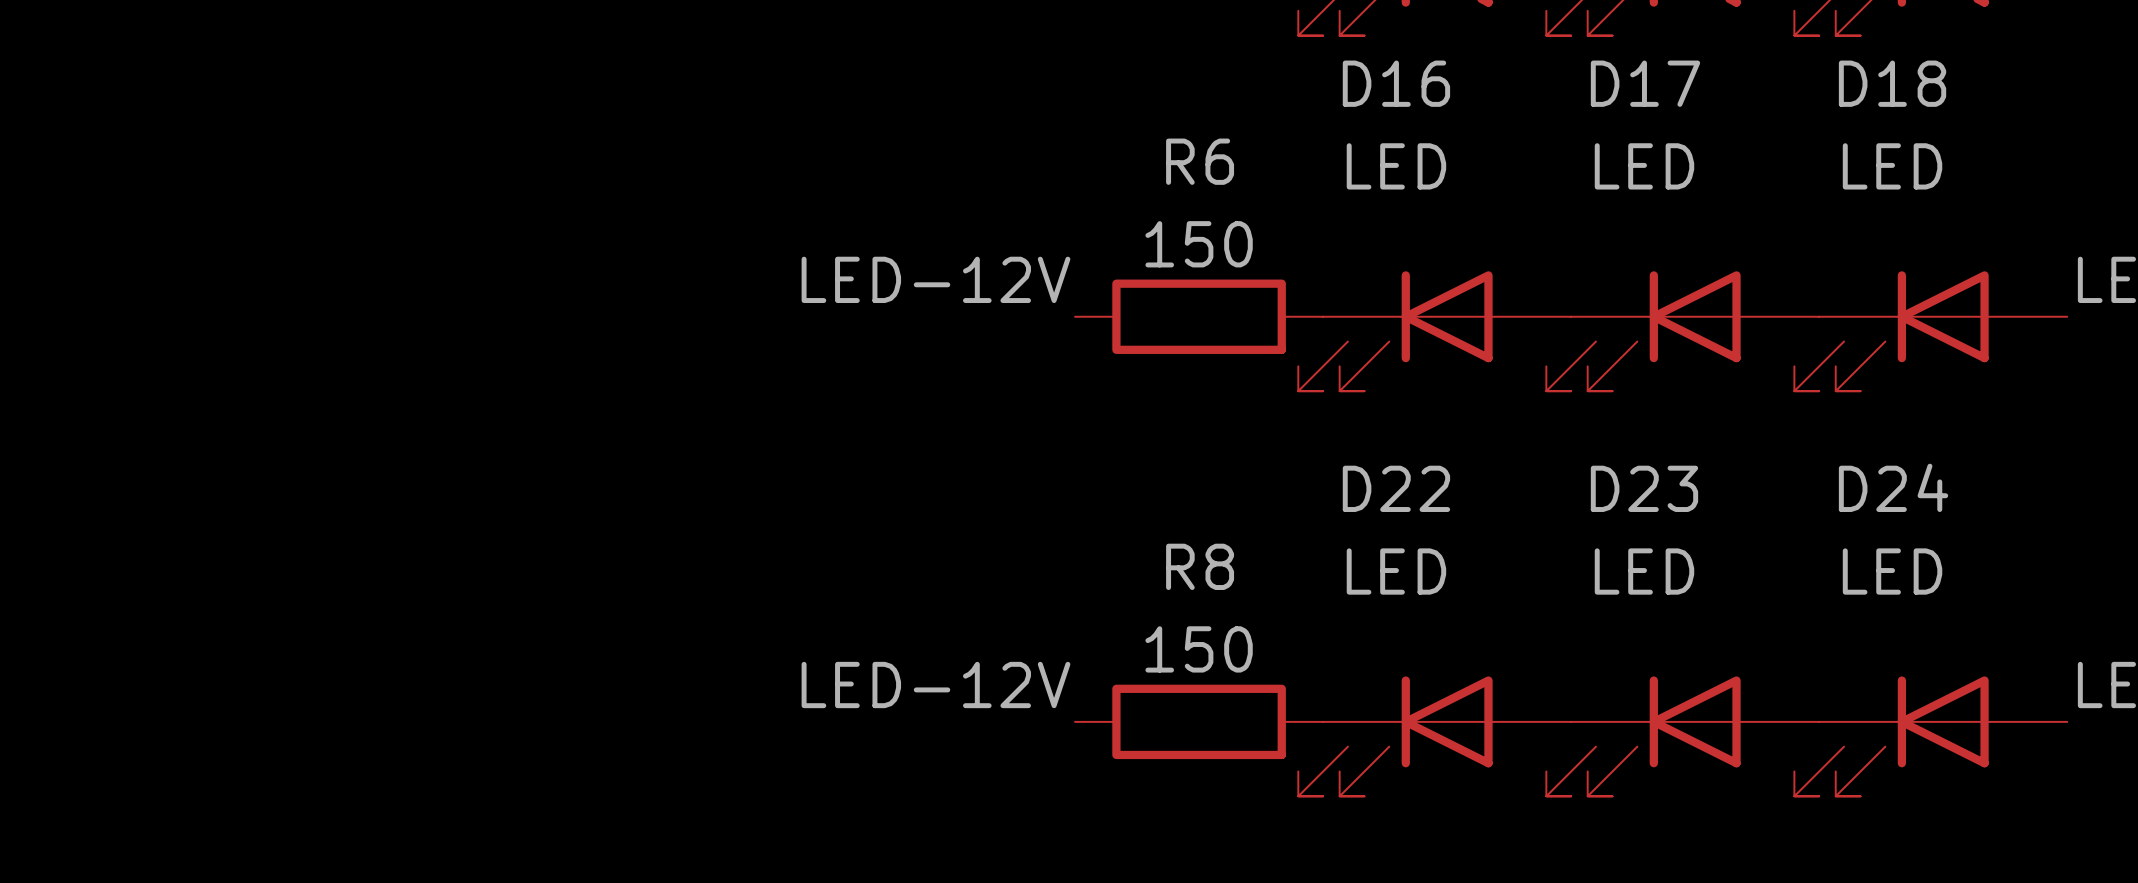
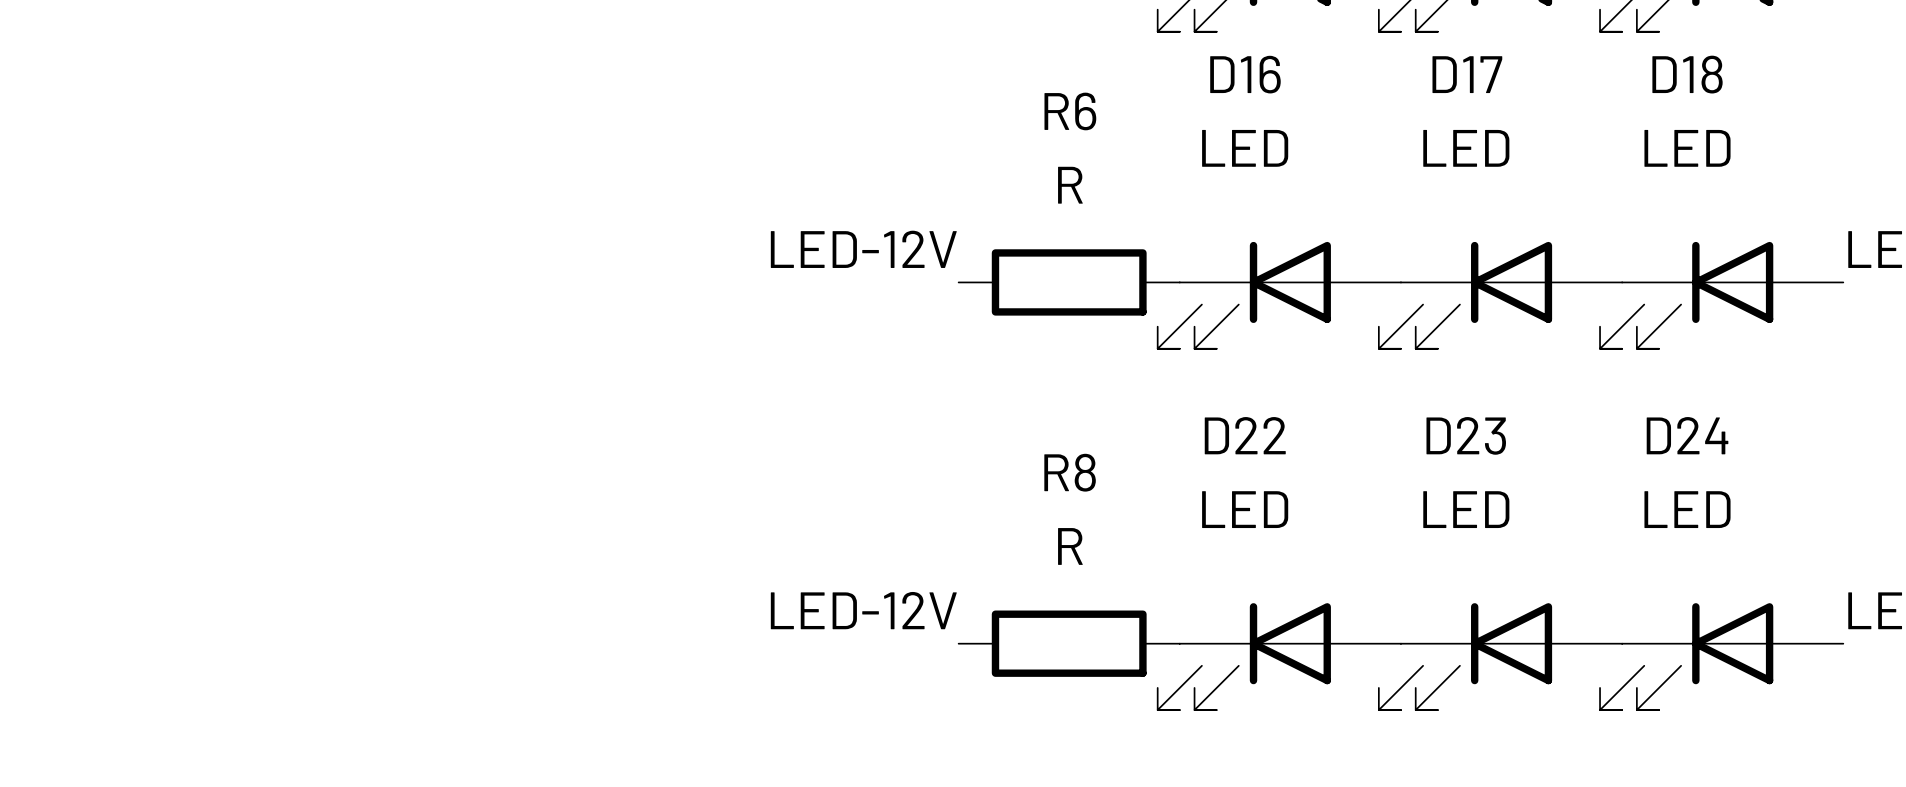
R6 name position: R6 (1200, 161) -> R6 (1070, 111)
R6 value: 150 (1199, 244) -> R (1070, 185)
R8 name position: R8 (1200, 566) -> R8 (1070, 472)
R8 value: 150 (1199, 649) -> R (1070, 546)

